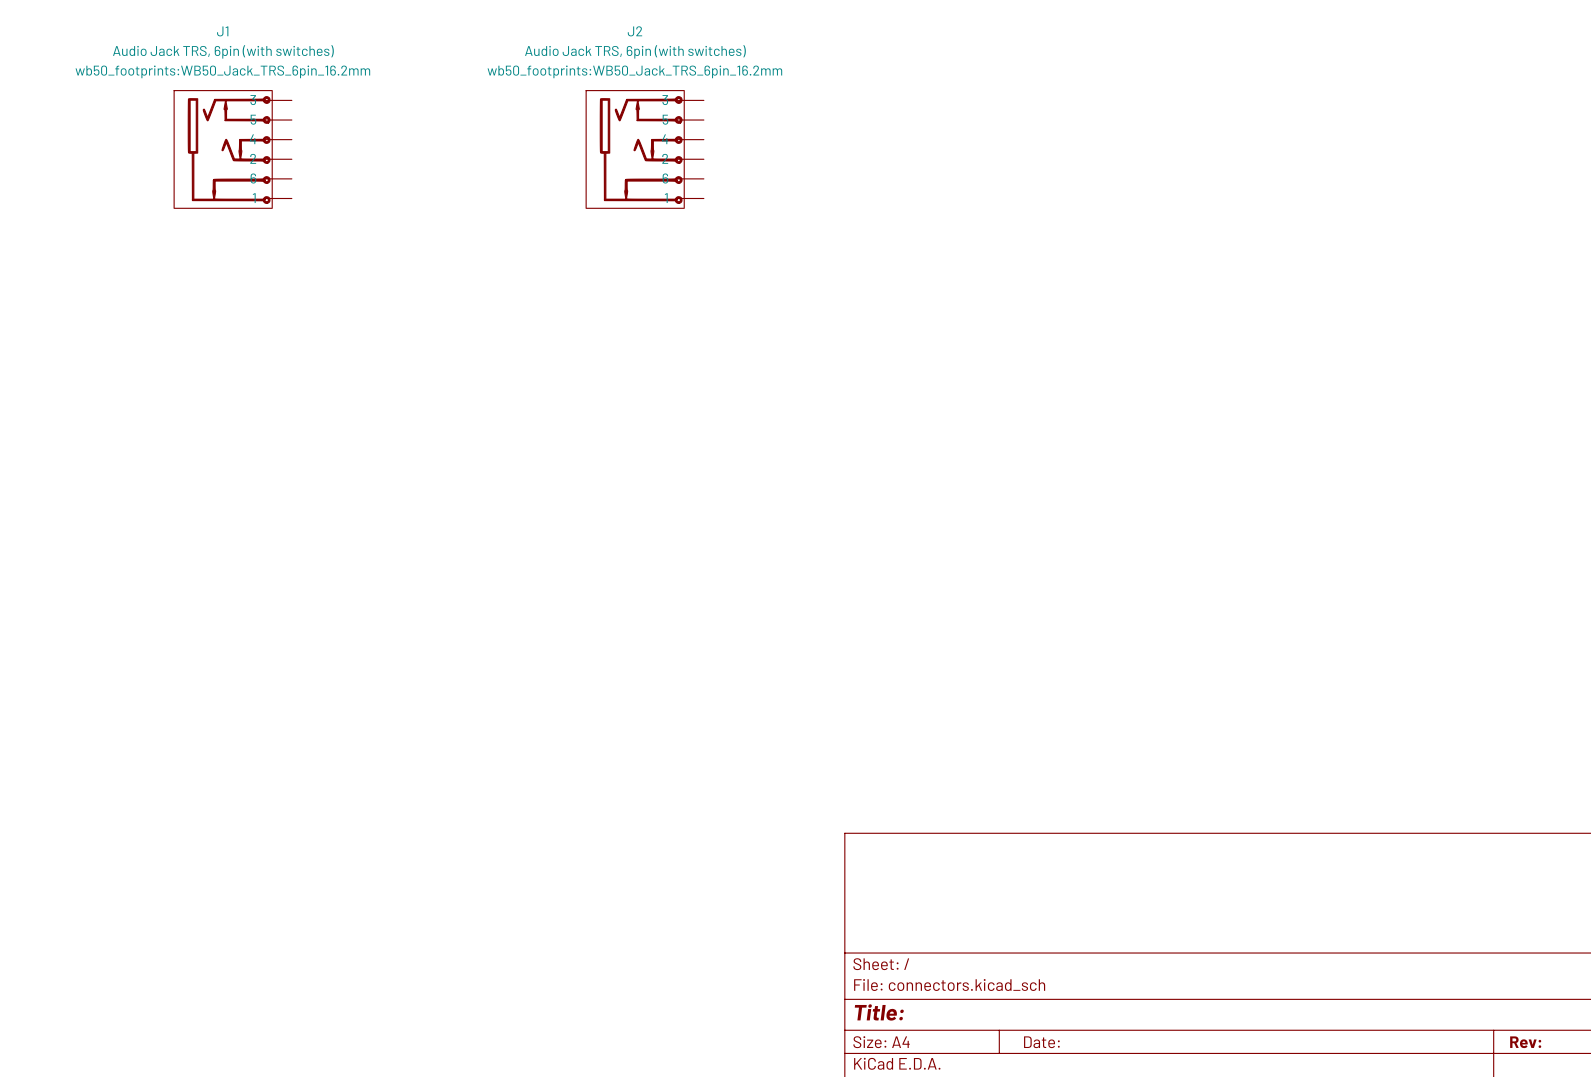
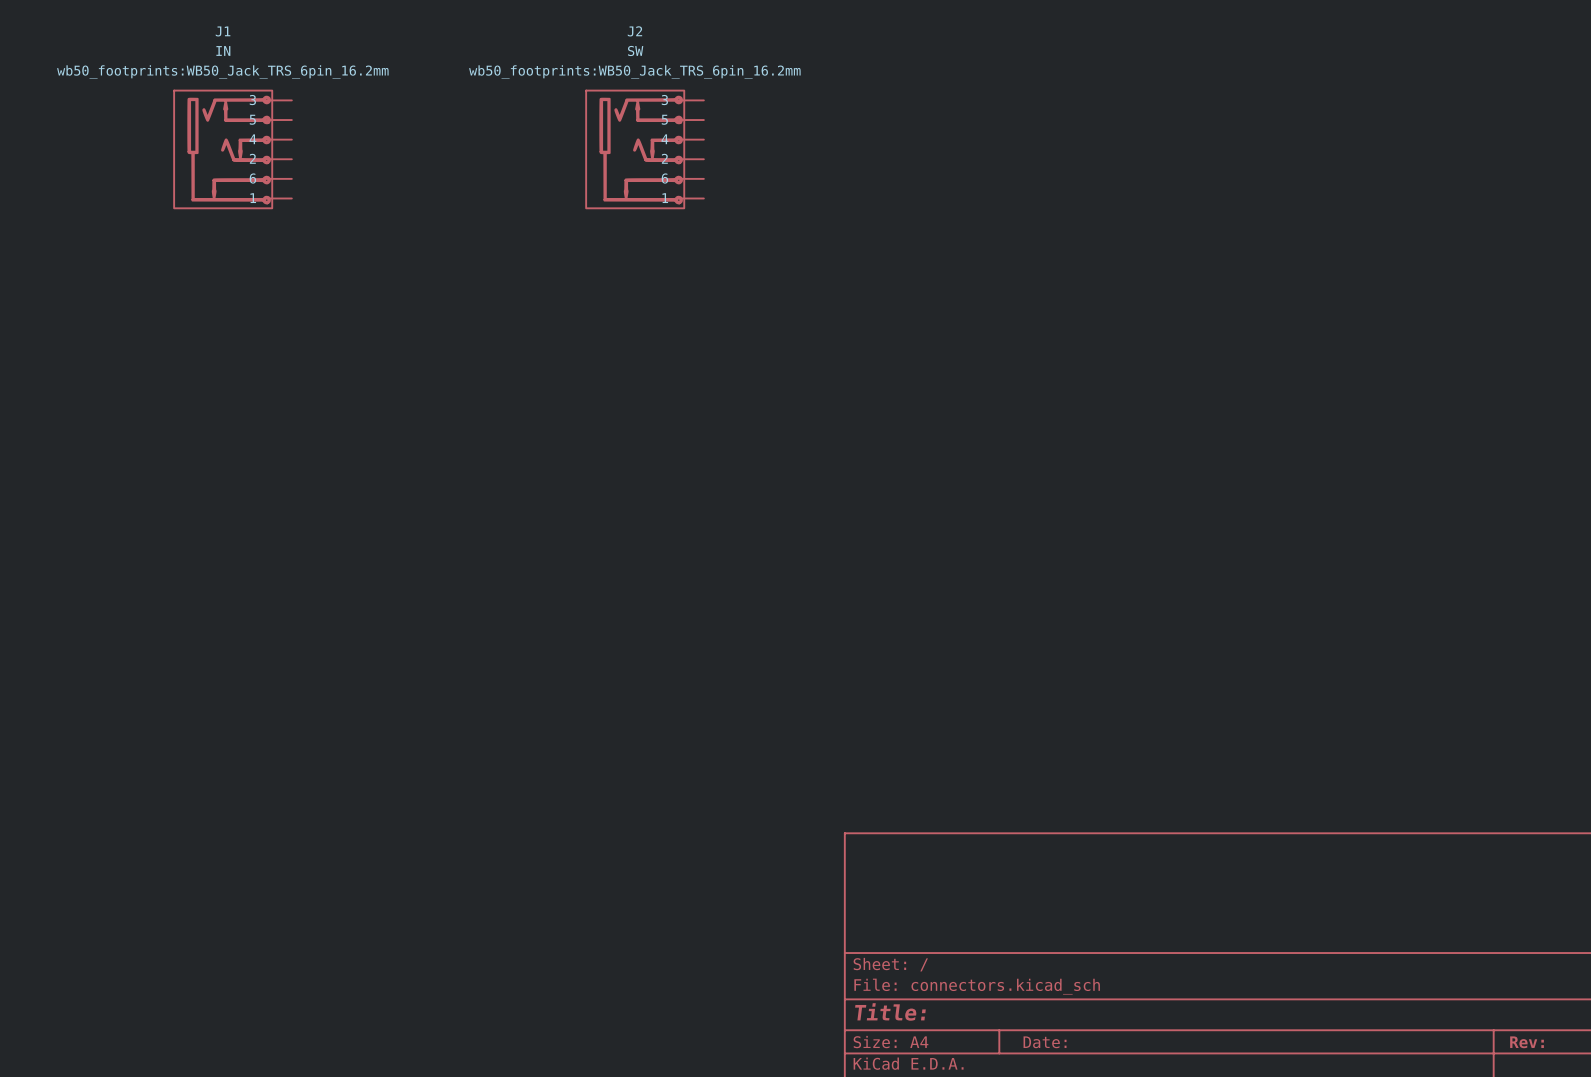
J1 value: Audio Jack TRS, 6pin (with switches) (223, 51) -> IN (223, 50)
J2 value: Audio Jack TRS, 6pin (with switches) (635, 51) -> SW (635, 50)

